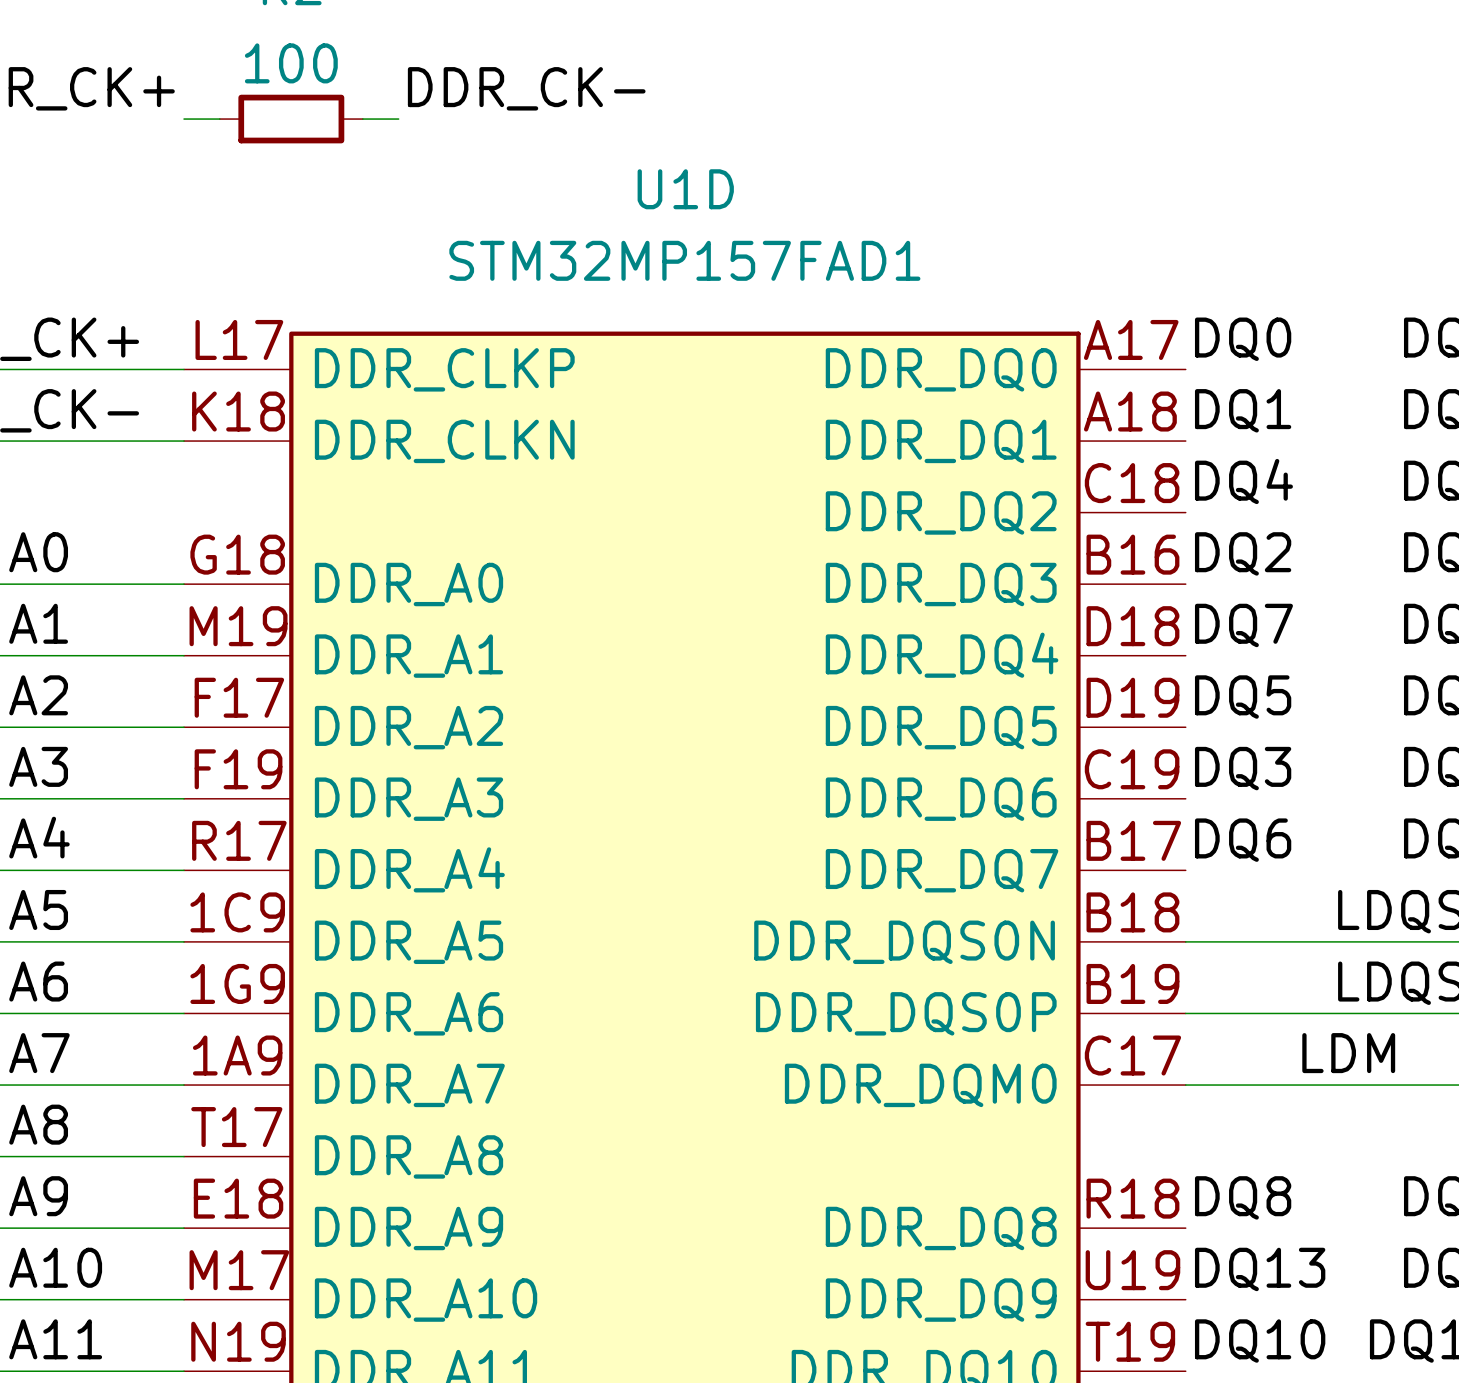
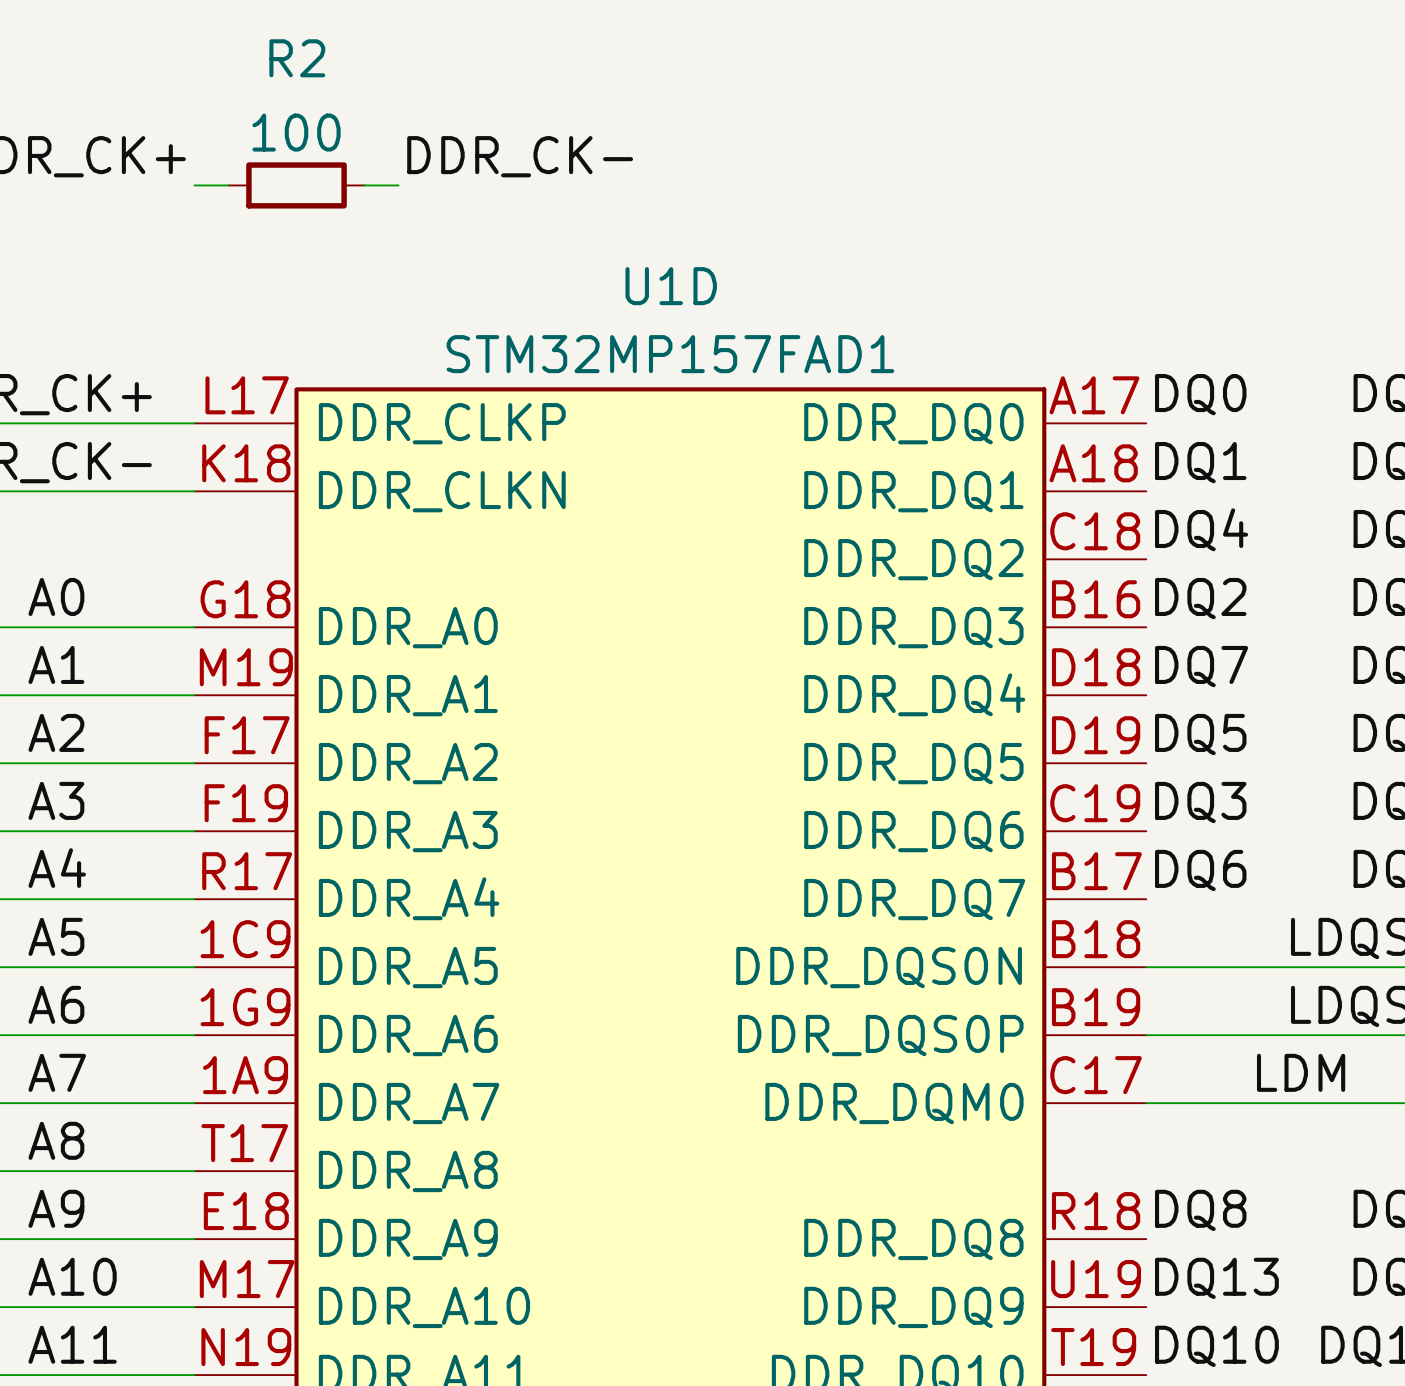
U1D name position: U1D (685, 189) -> U1D (671, 286)
U1D value position: STM32MP157FAD1 (684, 260) -> STM32MP157FAD1 (670, 354)

